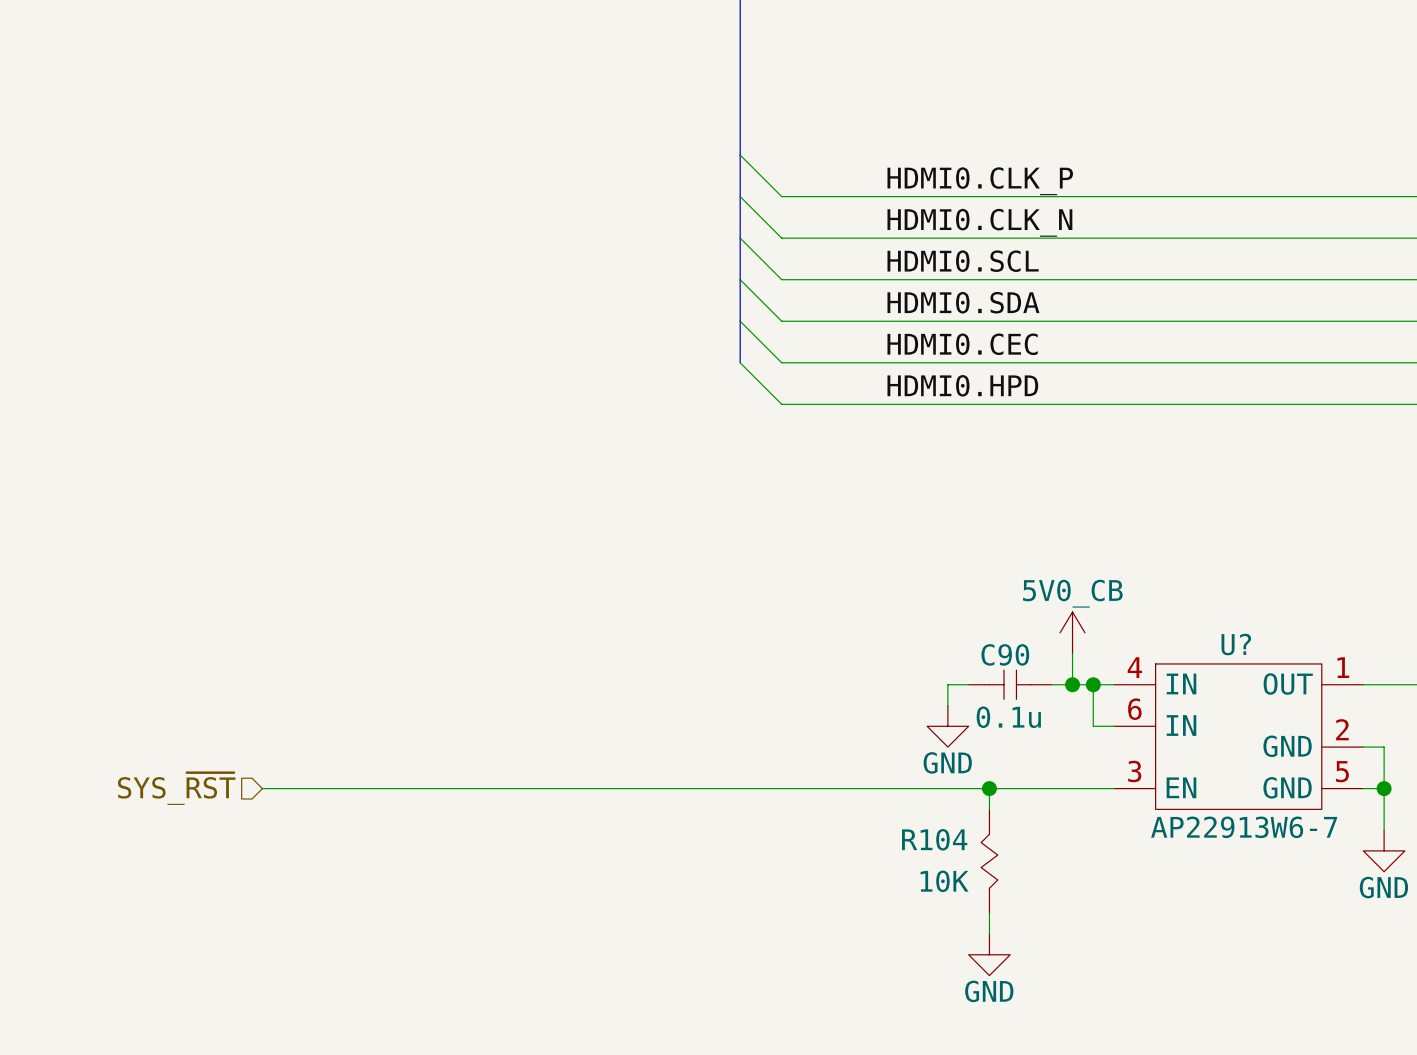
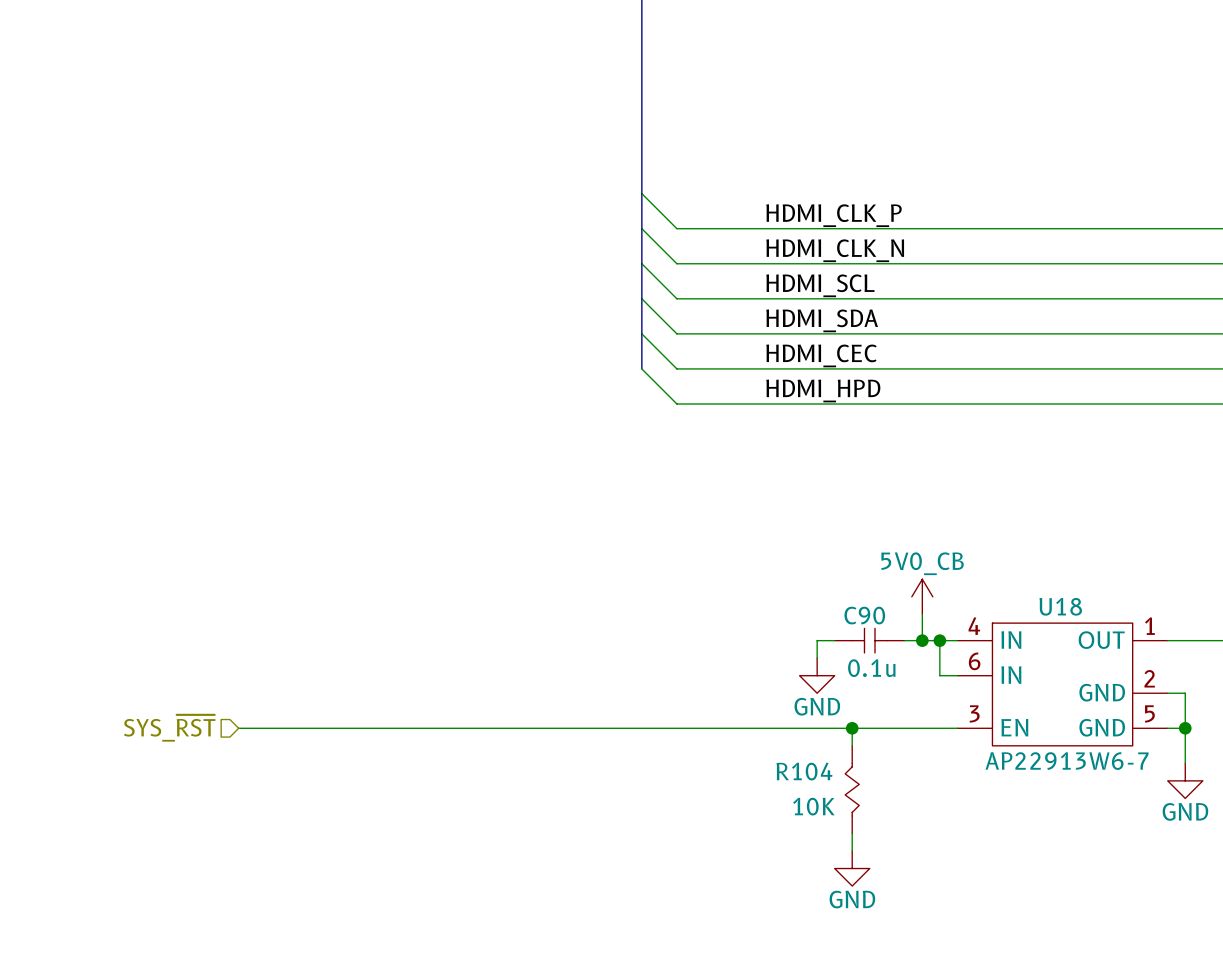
label: HDMI0.CLK_P (980, 181) -> HDMI_CLK_P (834, 215)
label: HDMI0.CLK_N (979, 222) -> HDMI_CLK_N (835, 250)
label: HDMI0.SCL (963, 261) -> HDMI_SCL (820, 285)
label: HDMI0.SDA (963, 302) -> HDMI_SDA (822, 320)
label: HDMI0.CEC (962, 344) -> HDMI_CEC (821, 355)
label: HDMI0.HPD (962, 385) -> HDMI_HPD (823, 390)
U? name: U? (1236, 644) -> U18 (1060, 606)

